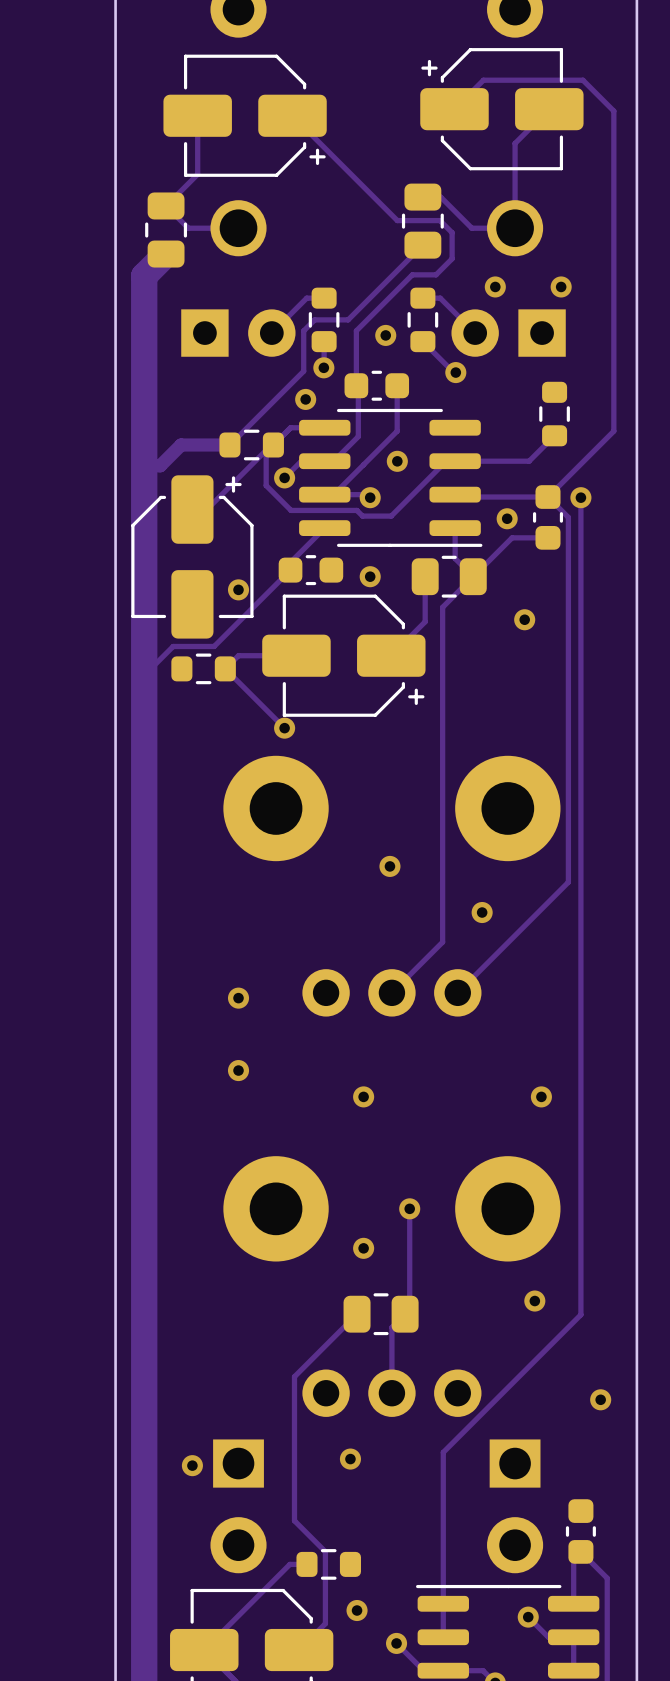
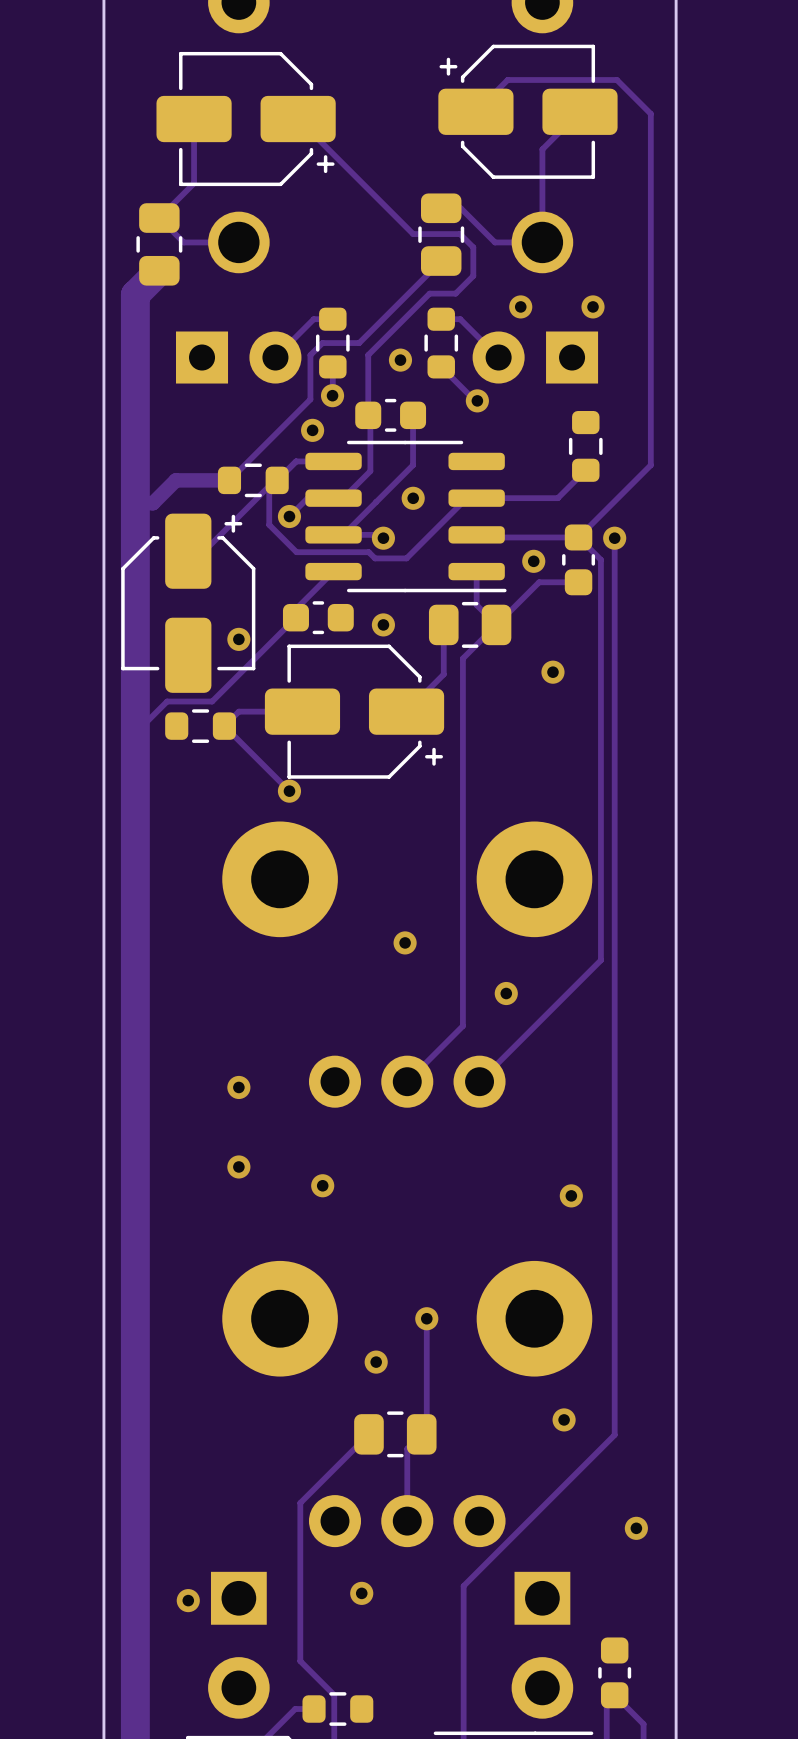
via position: (363, 1096) -> (322, 1185)

